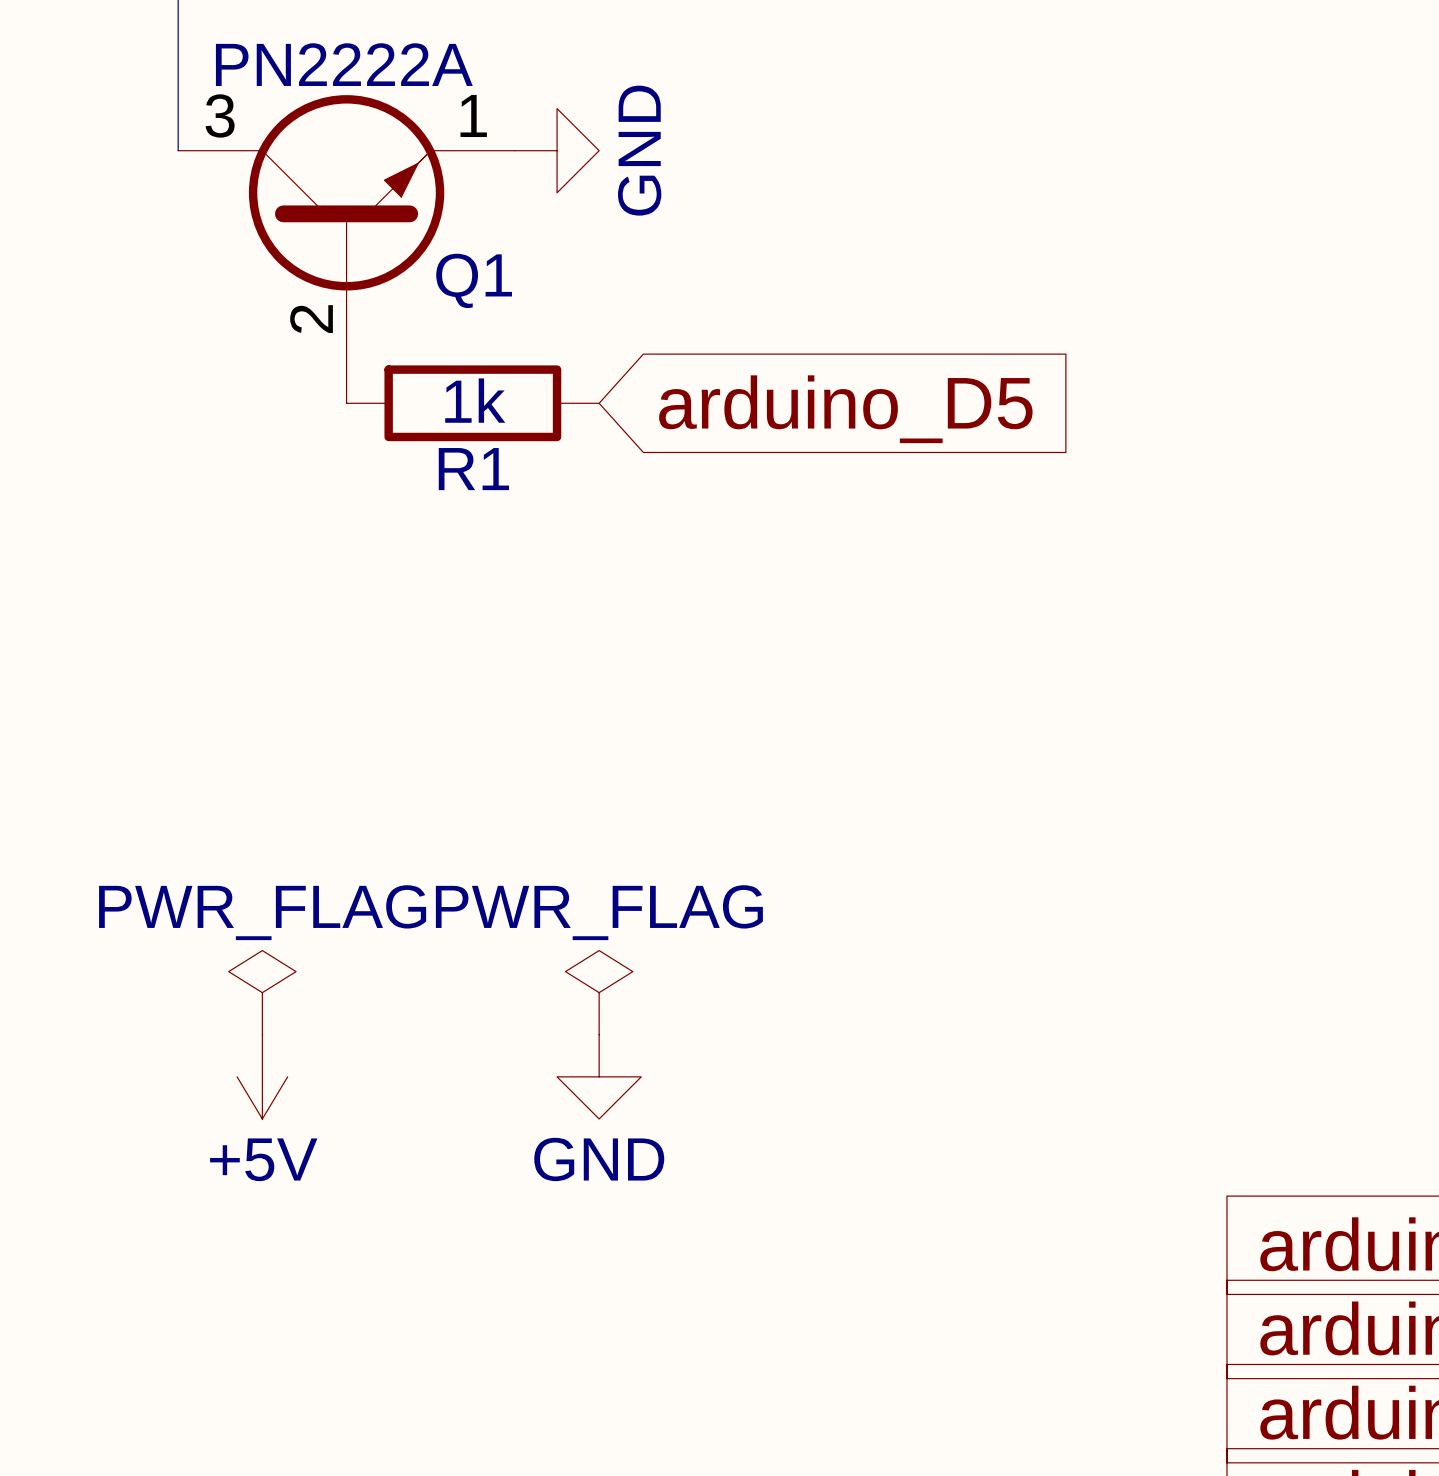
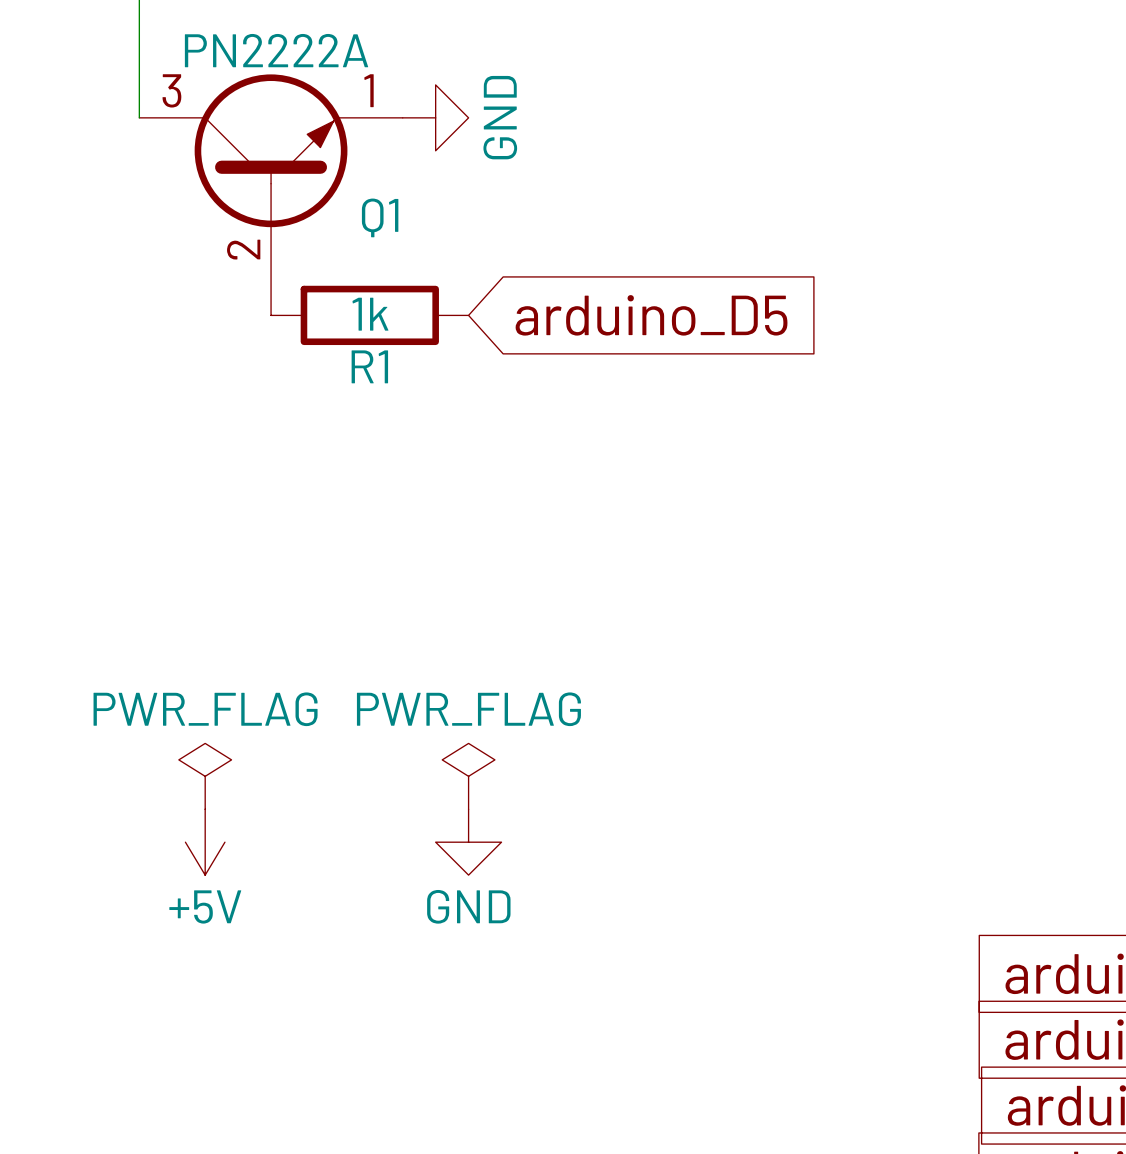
Q1 symbol: [178, 95, 515, 404] -> [139, 74, 403, 316]

